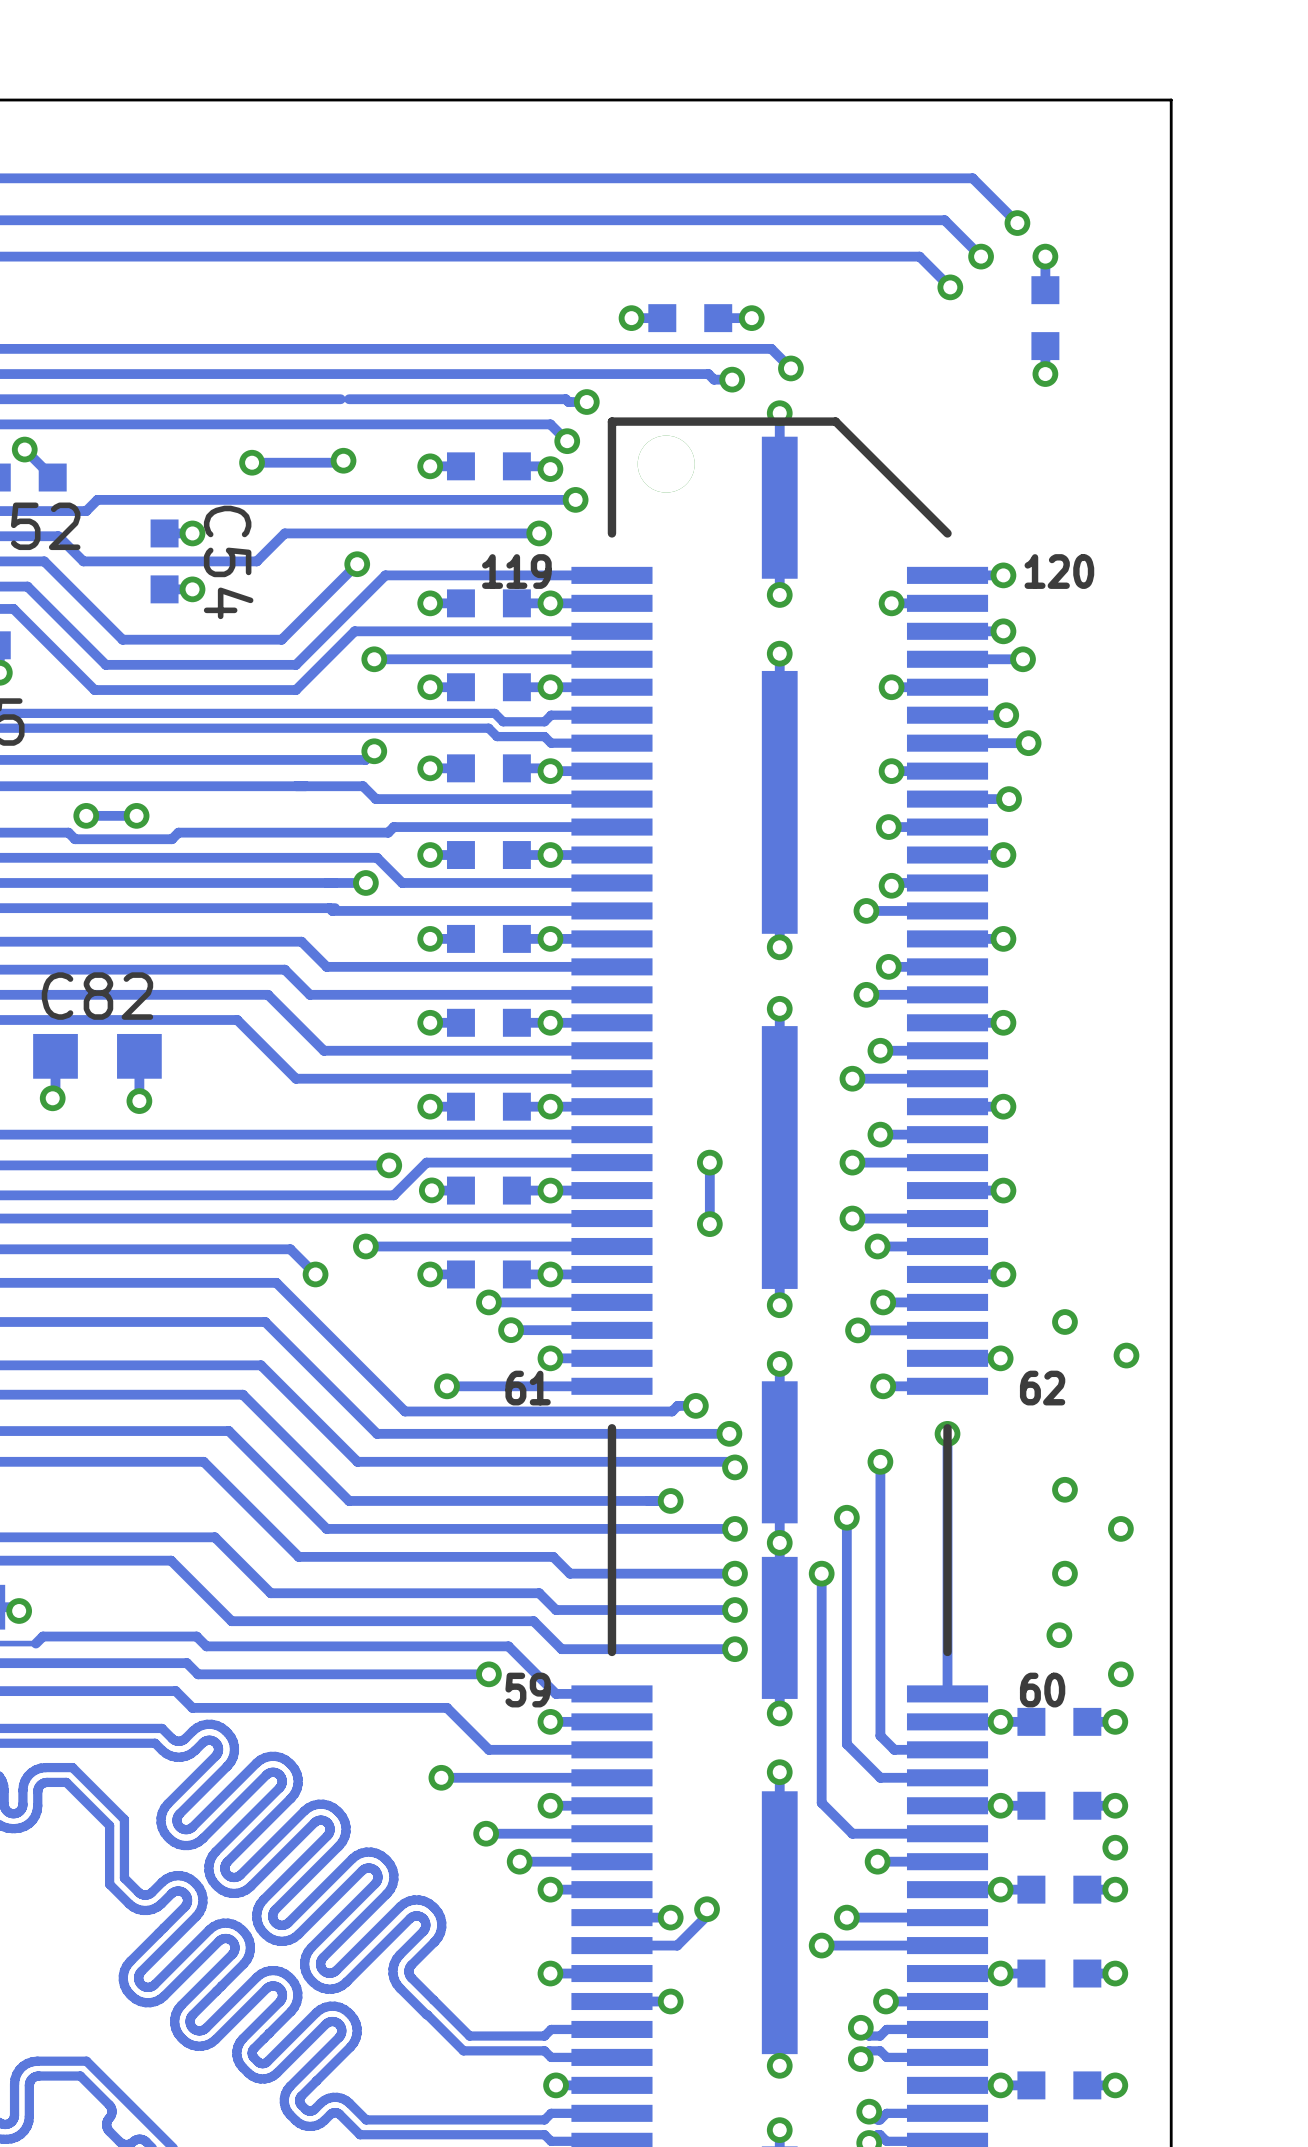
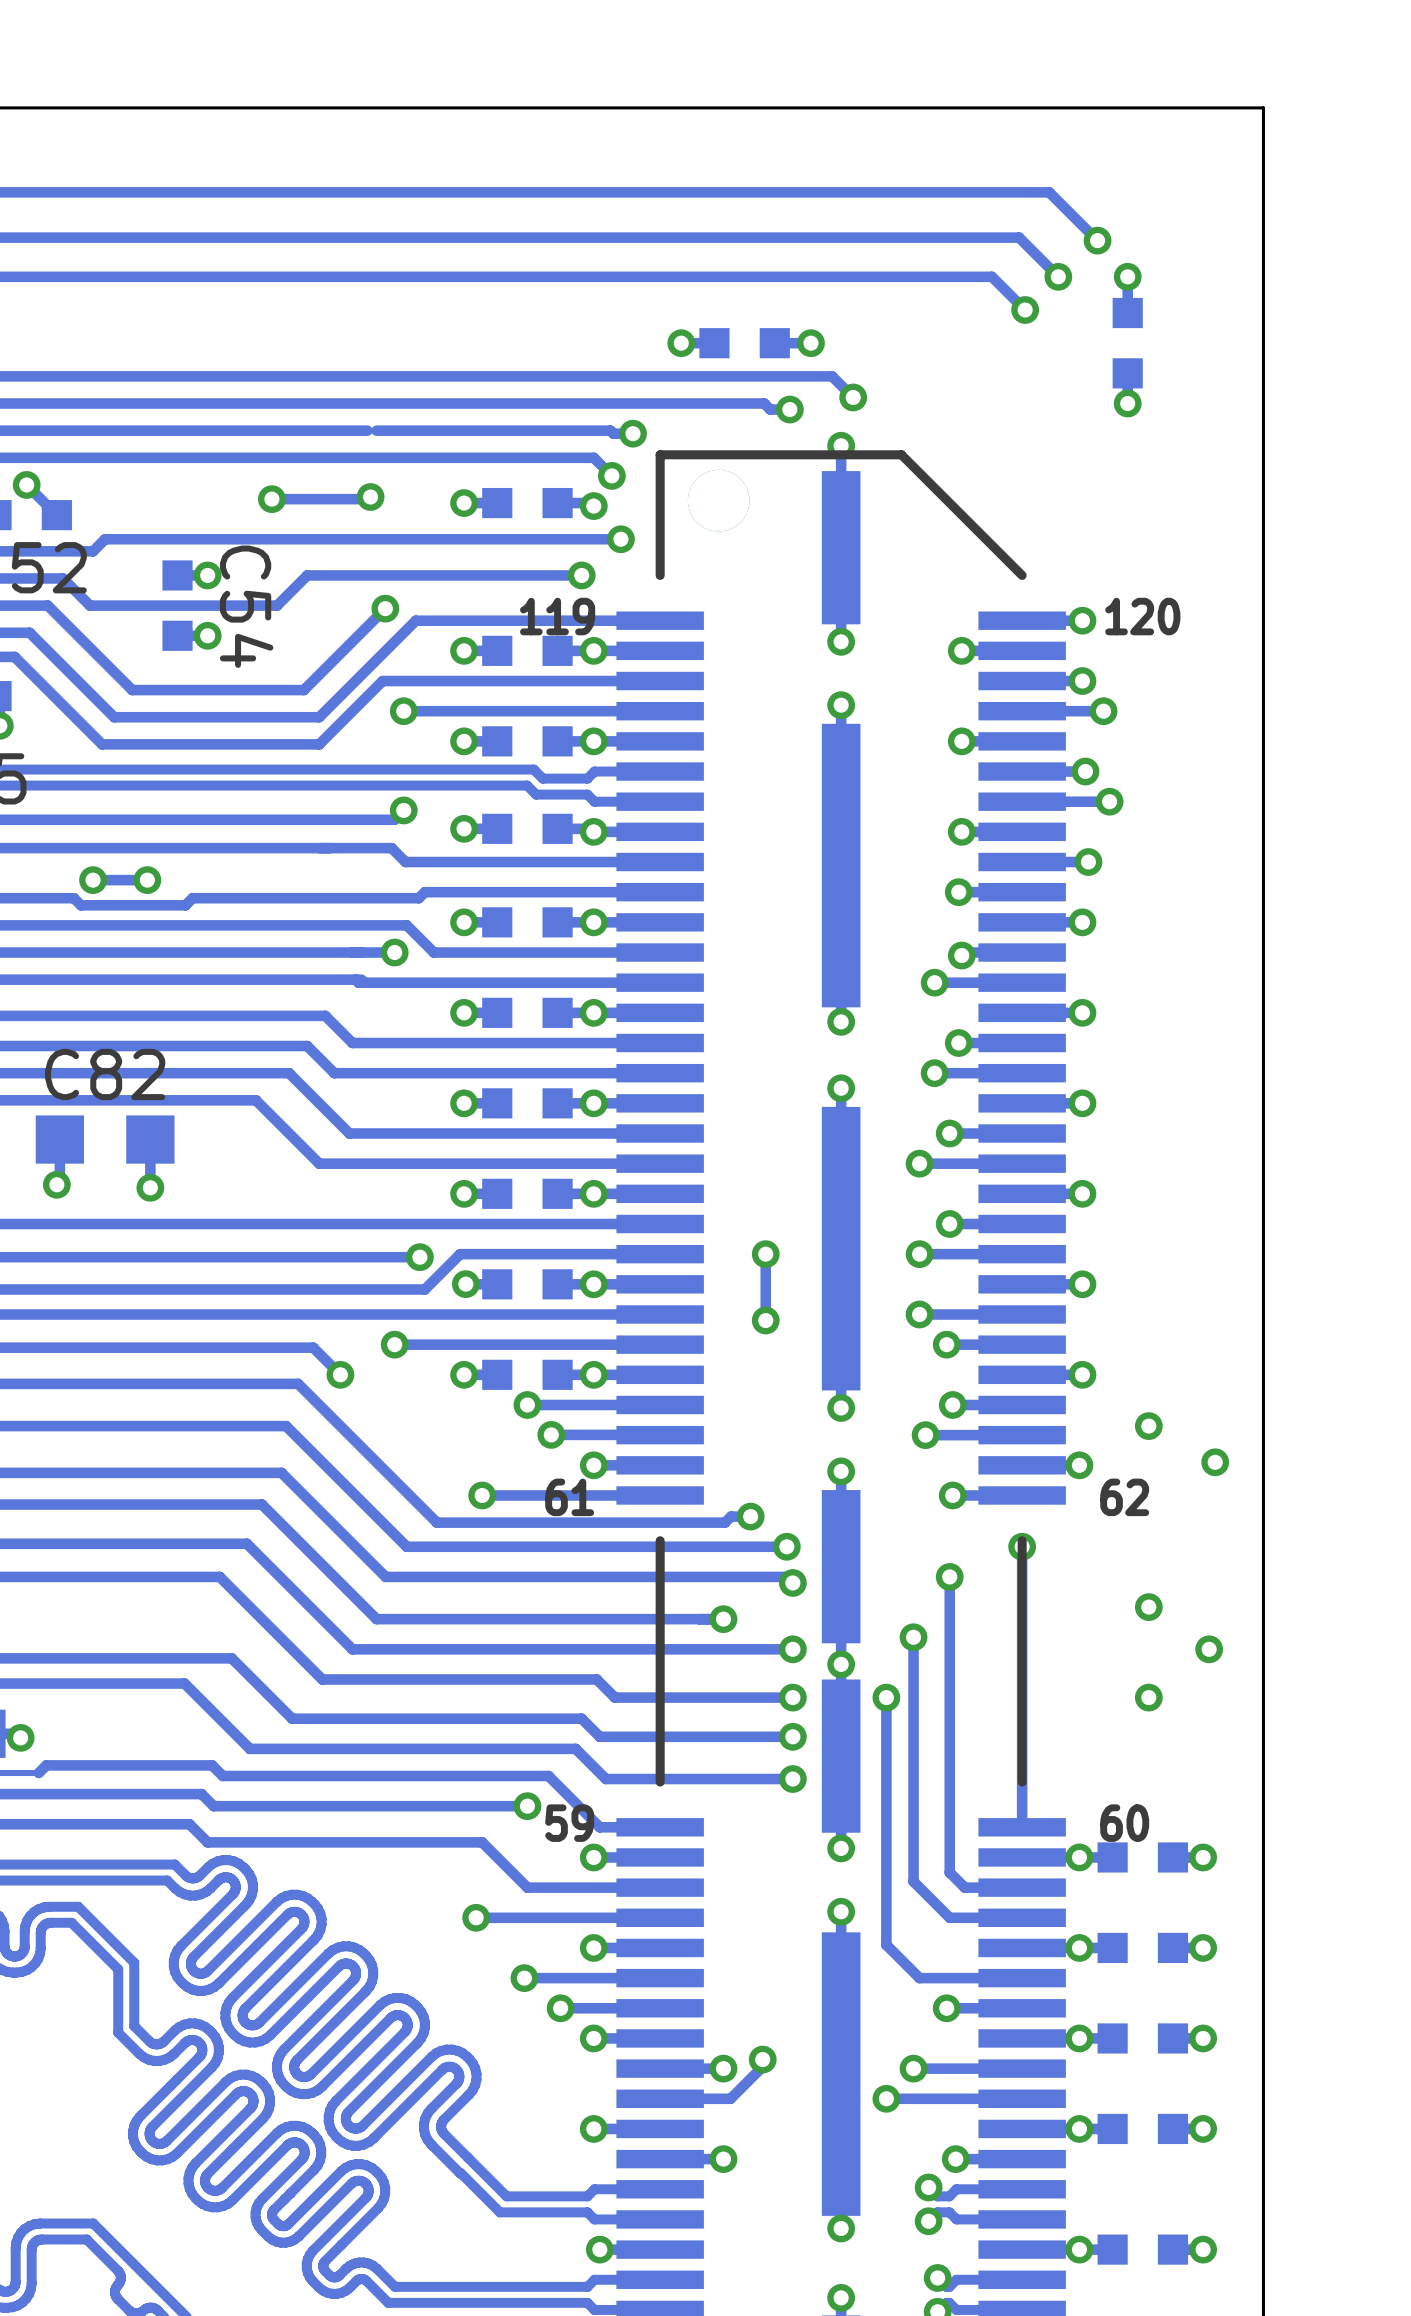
via: (1059, 1635) -> none
via: (1120, 1674) -> none
via: (1115, 1847) -> none

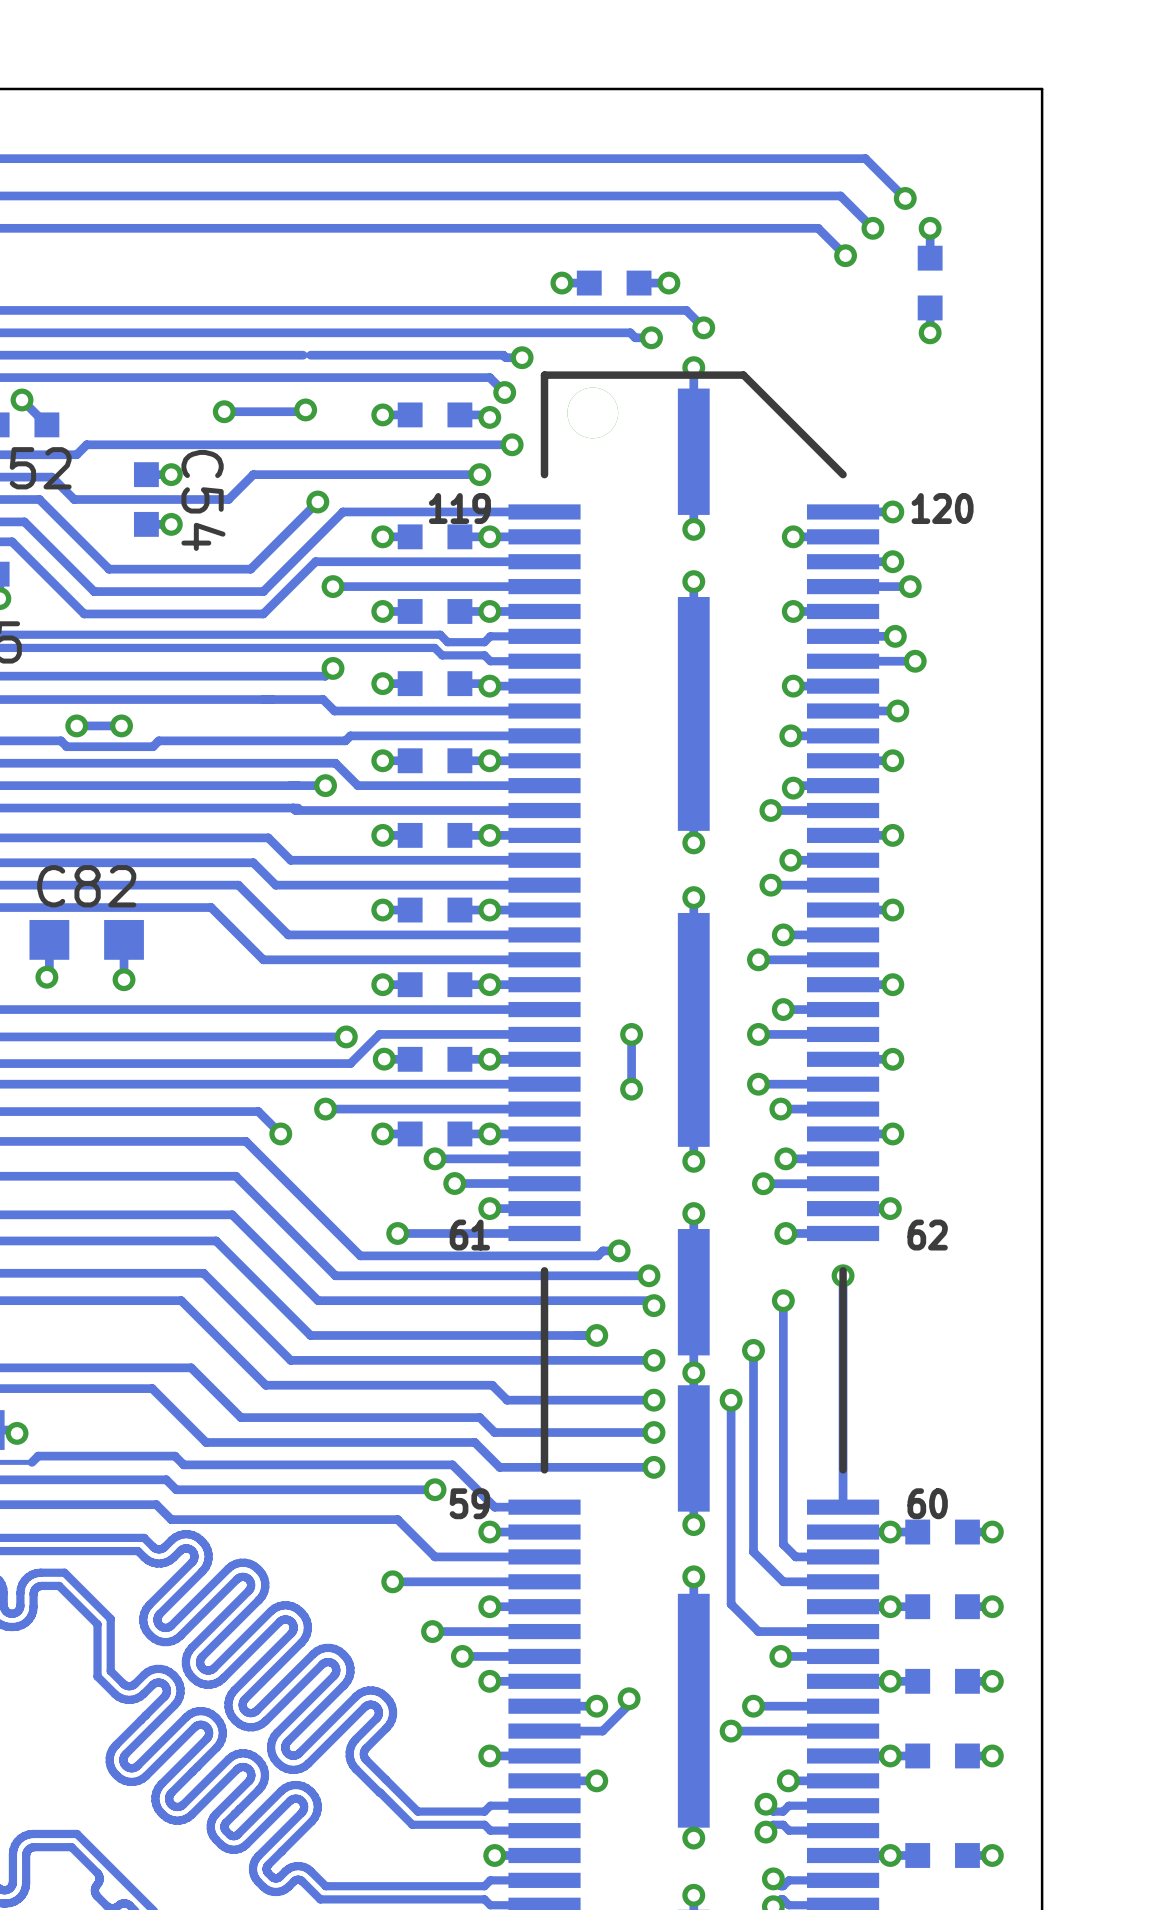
via: (1148, 1426) -> none
via: (1215, 1462) -> none
via: (1148, 1607) -> none
via: (1209, 1649) -> none
via: (1148, 1697) -> none

